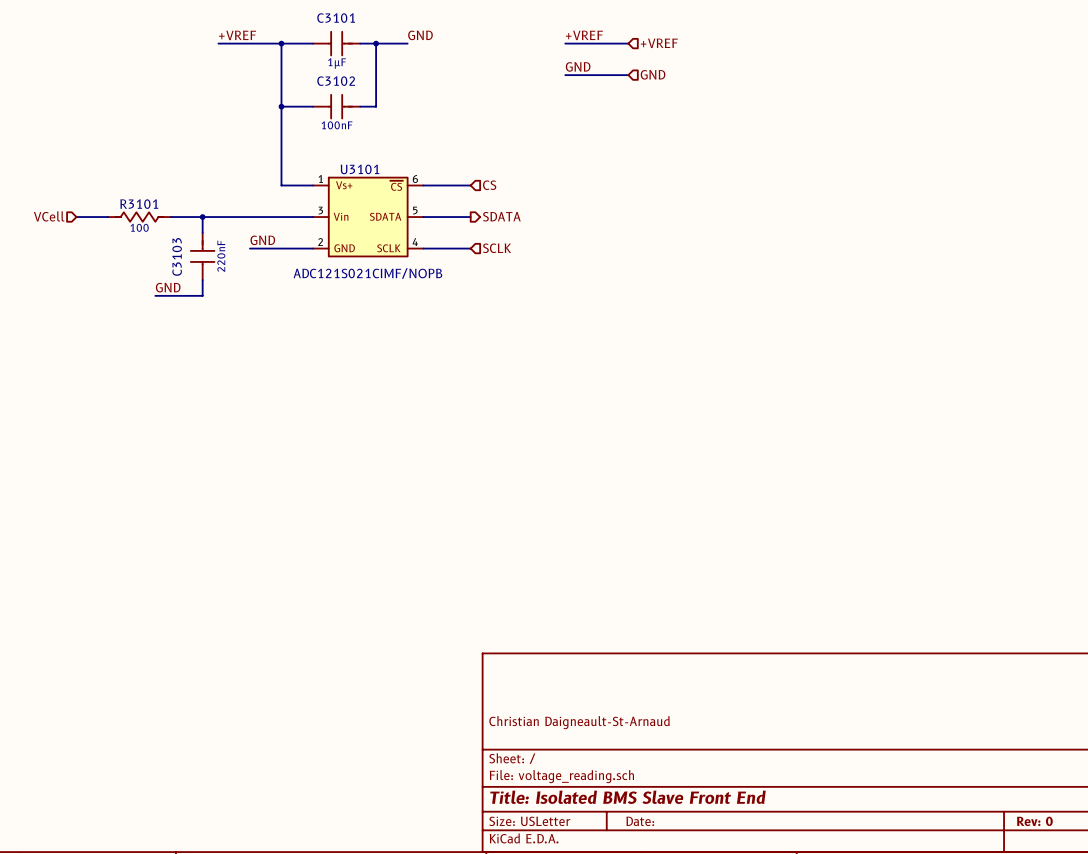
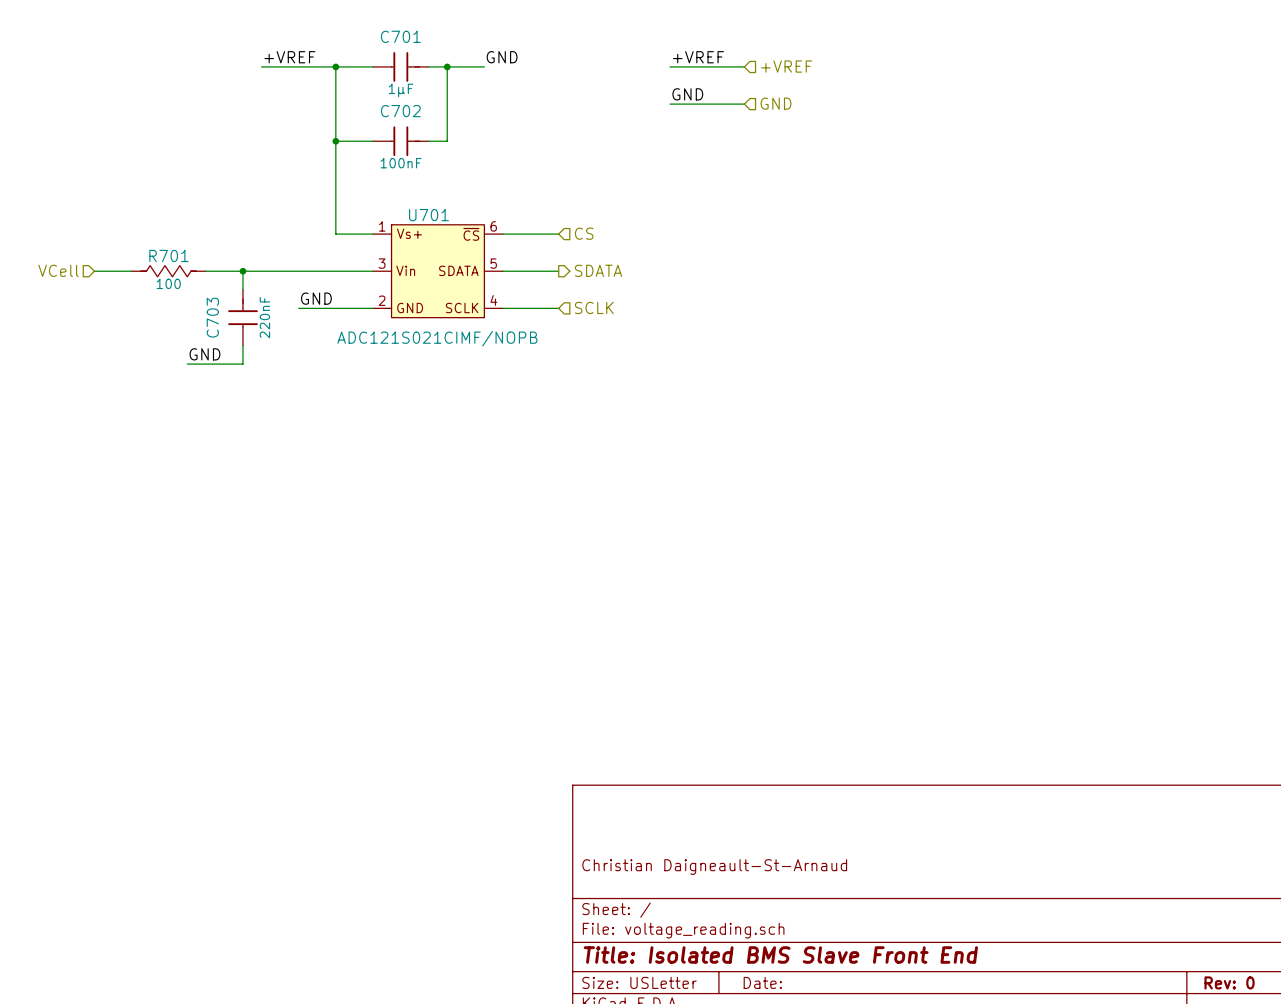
C3101 name: C3101 (336, 18) -> C701 (400, 36)
C3102 name: C3102 (336, 81) -> C702 (400, 111)
U3101 name: U3101 (360, 169) -> U701 (428, 215)
R3101 name: R3101 (139, 204) -> R701 (168, 255)
C3103 name: C3103 (177, 256) -> C703 (212, 317)

